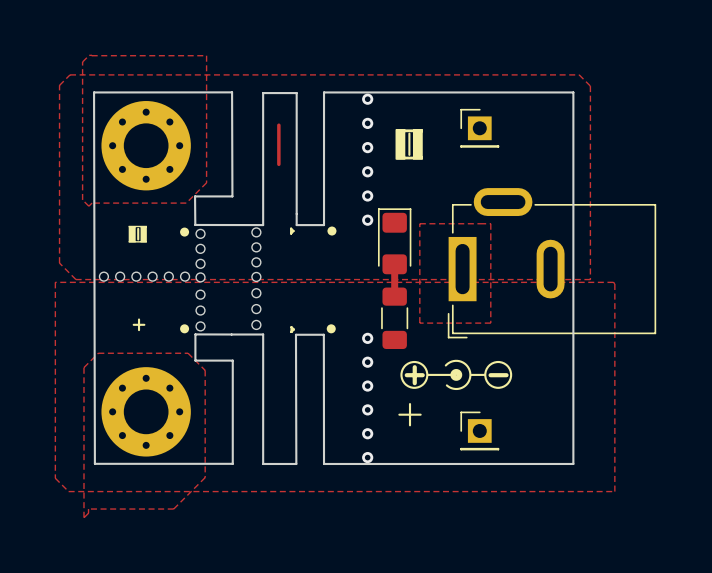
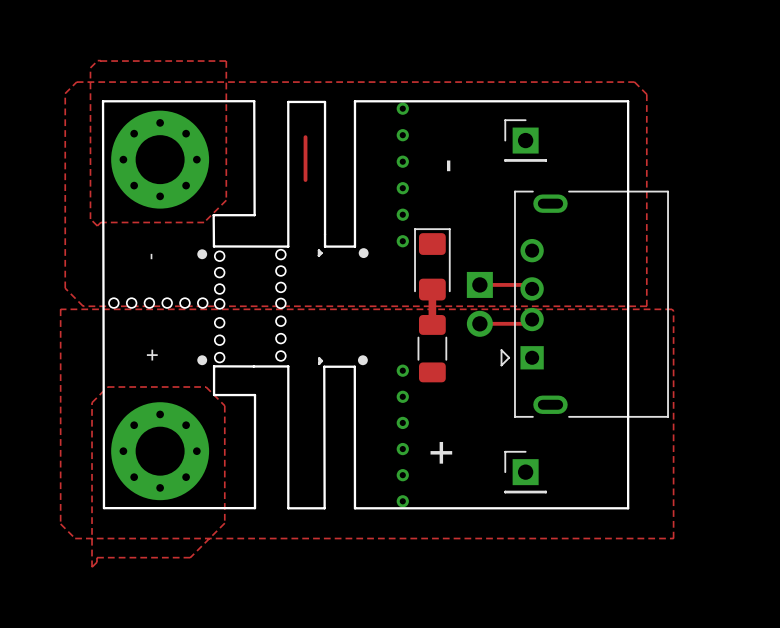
drawing: [395, 129, 423, 160] -> none
zone outline: (419, 223) (490, 223) (490, 323) (419, 323) (419, 223) -> none
drawing: [128, 225, 147, 243] -> none
track: none -> (479, 284) (528, 284) (532, 288)
part: (551, 263) -> none
part: none -> (479, 304)
part: none -> (584, 304)
track: none -> (532, 319) (527, 323) (479, 323)
drawing: [400, 359, 513, 391] -> none
text: + (414, 375) -> none
text: - (498, 375) -> none

